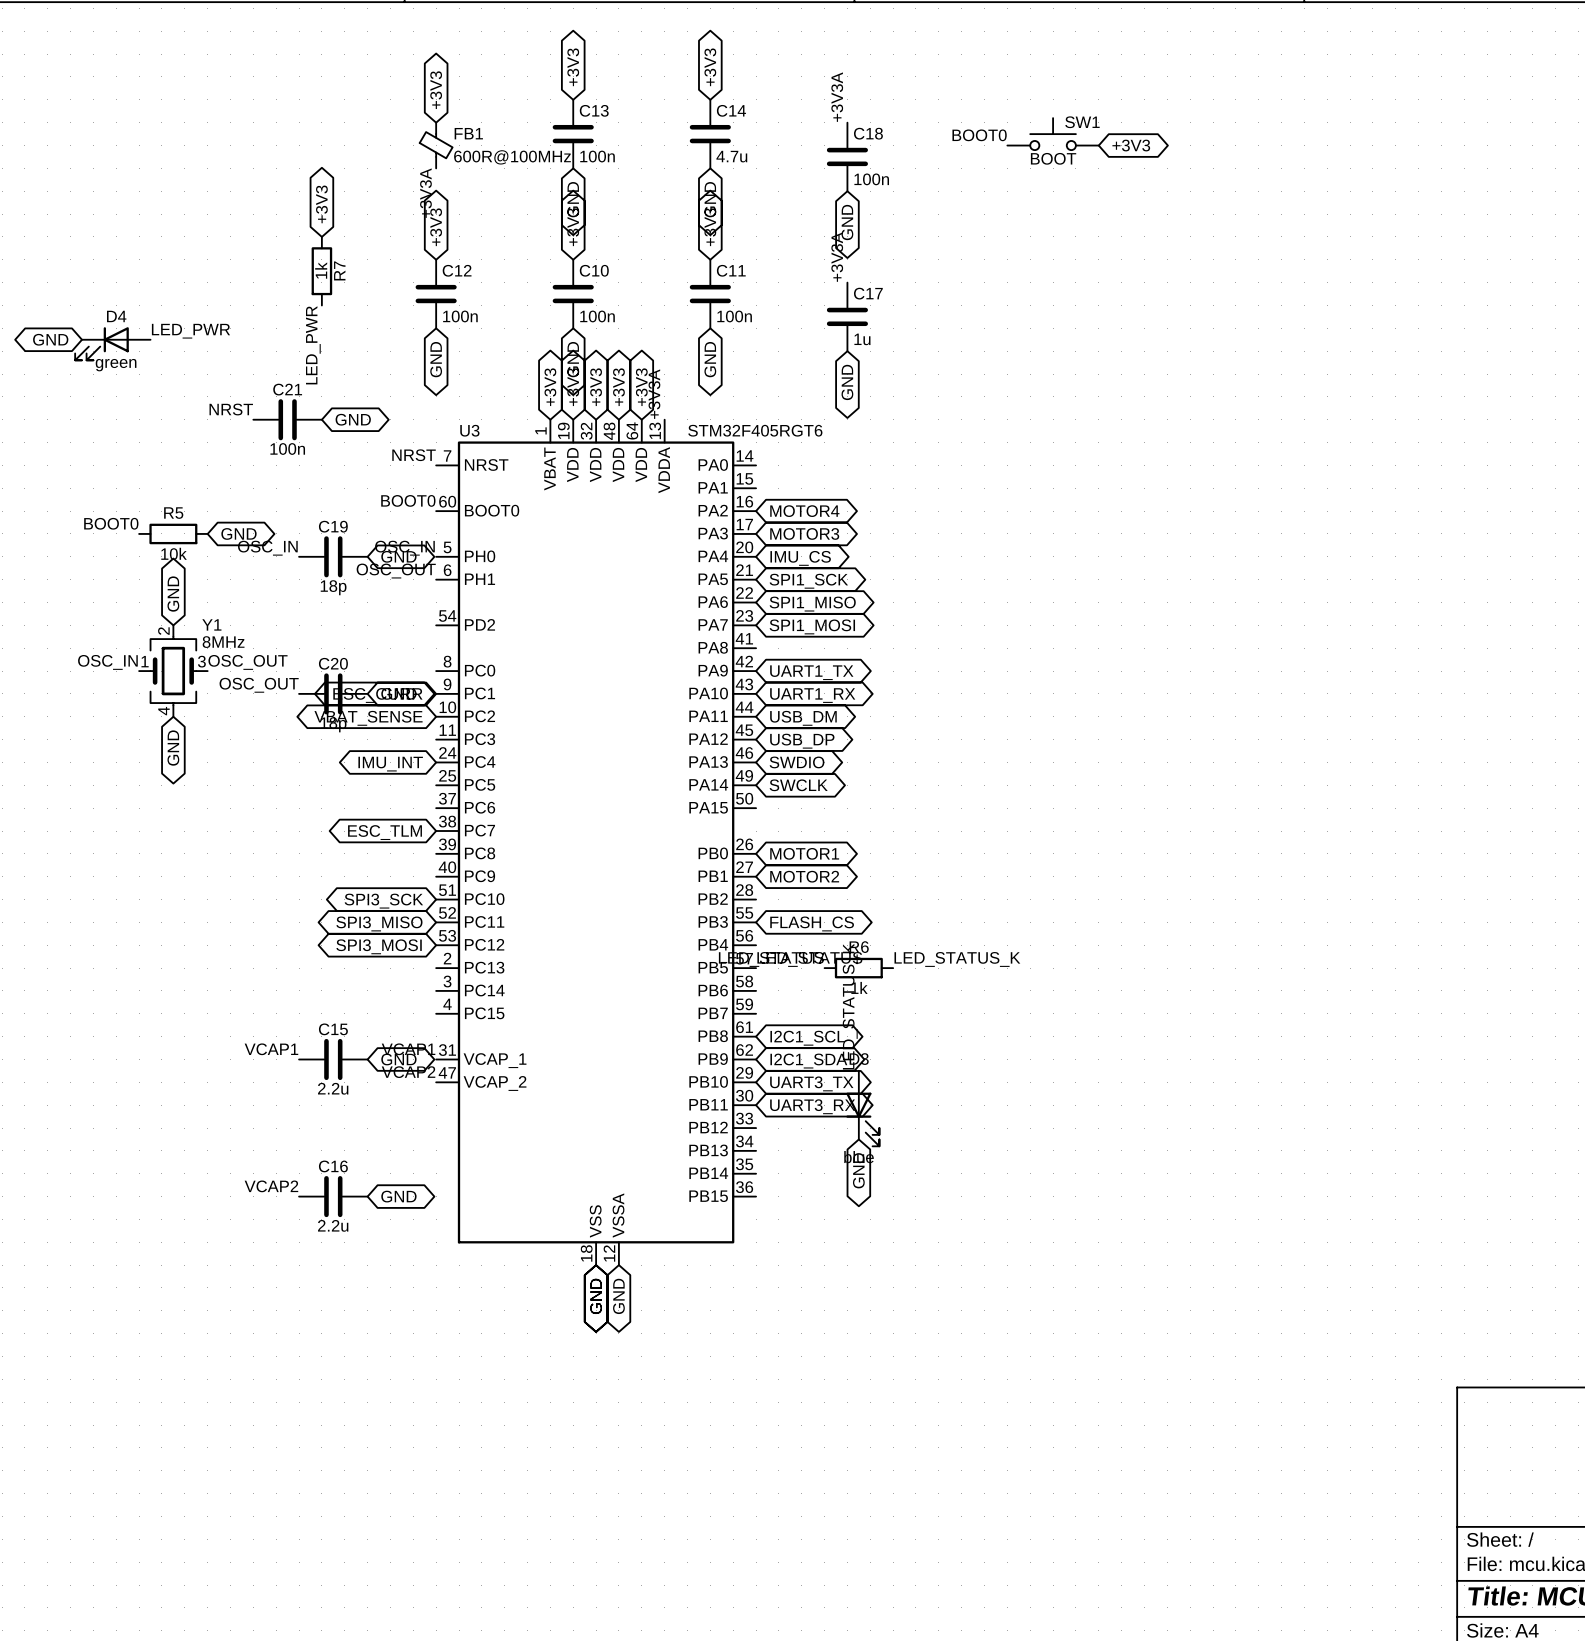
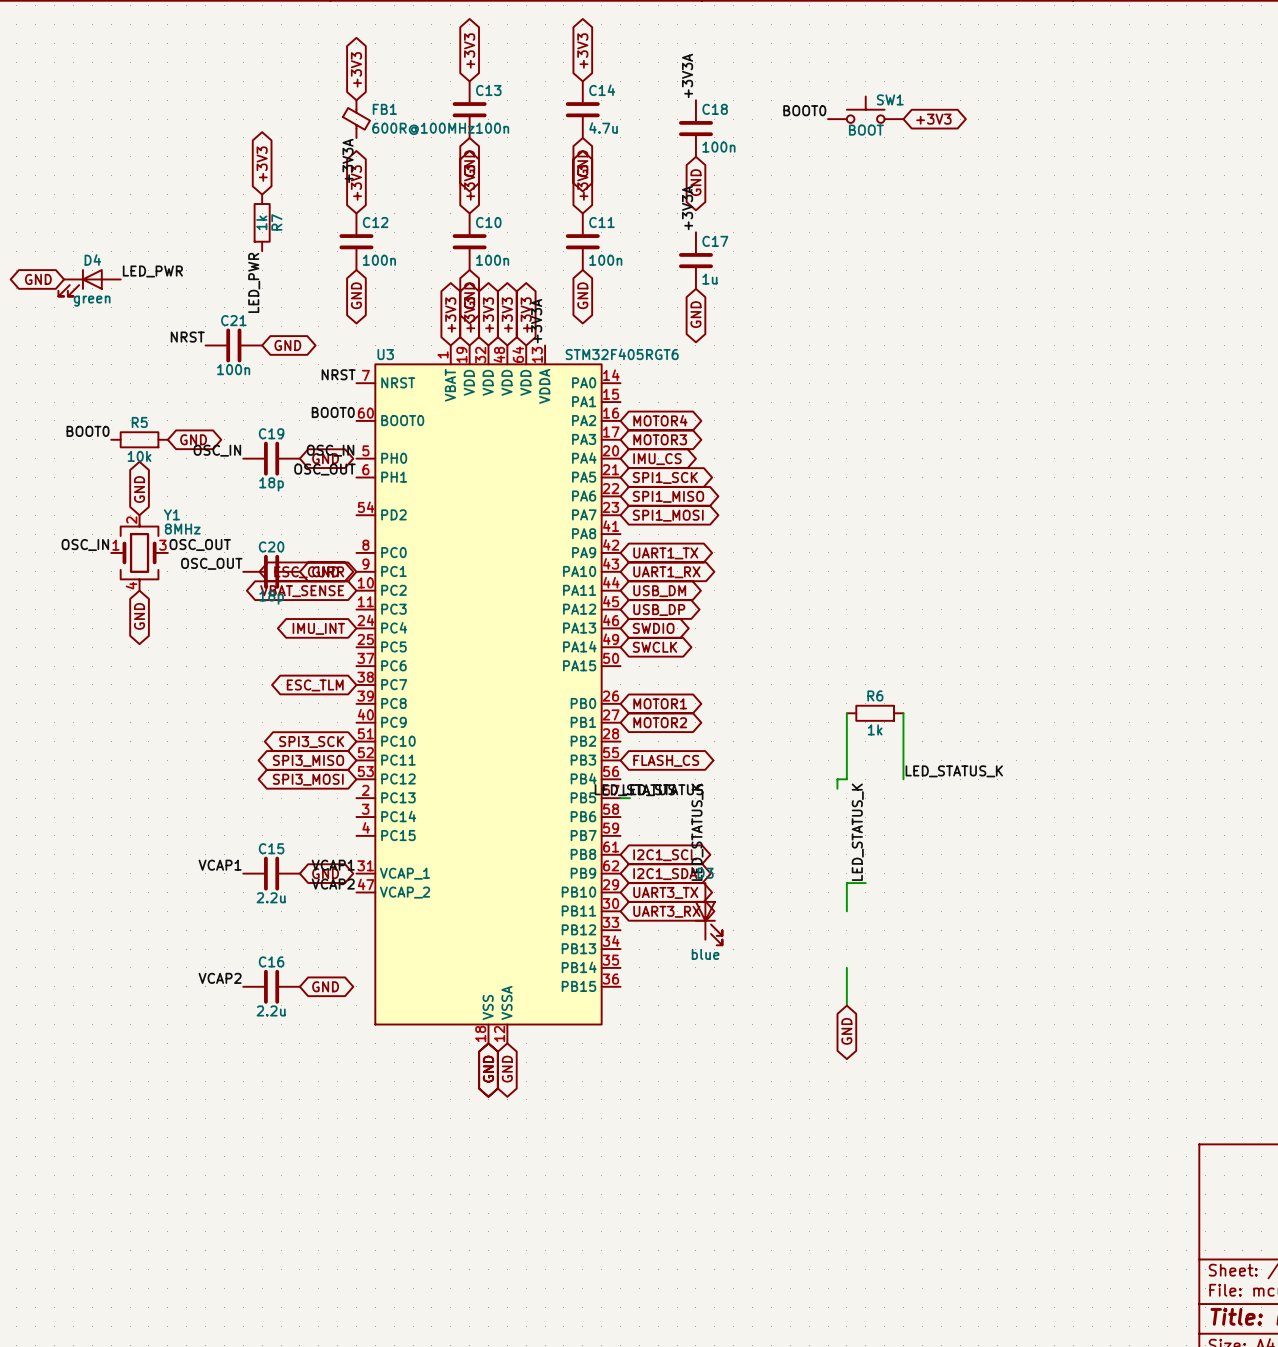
wire: none -> (846, 713) (846, 779) (837, 779) (837, 788)
wire: none -> (903, 713) (903, 779)
label: none -> LED_STATUS_K (954, 771)
label: LED_STATUS_K (957, 959) -> none
wire: none -> (620, 798) (629, 798)
R6 position: (858, 968) -> (875, 713)
label: none -> LED_STATUS_K (857, 832)
wire: none -> (865, 883) (846, 883) (846, 911)
global label position: GND (858, 1170) -> GND (846, 1031)
wire: none -> (846, 967) (846, 1005)

